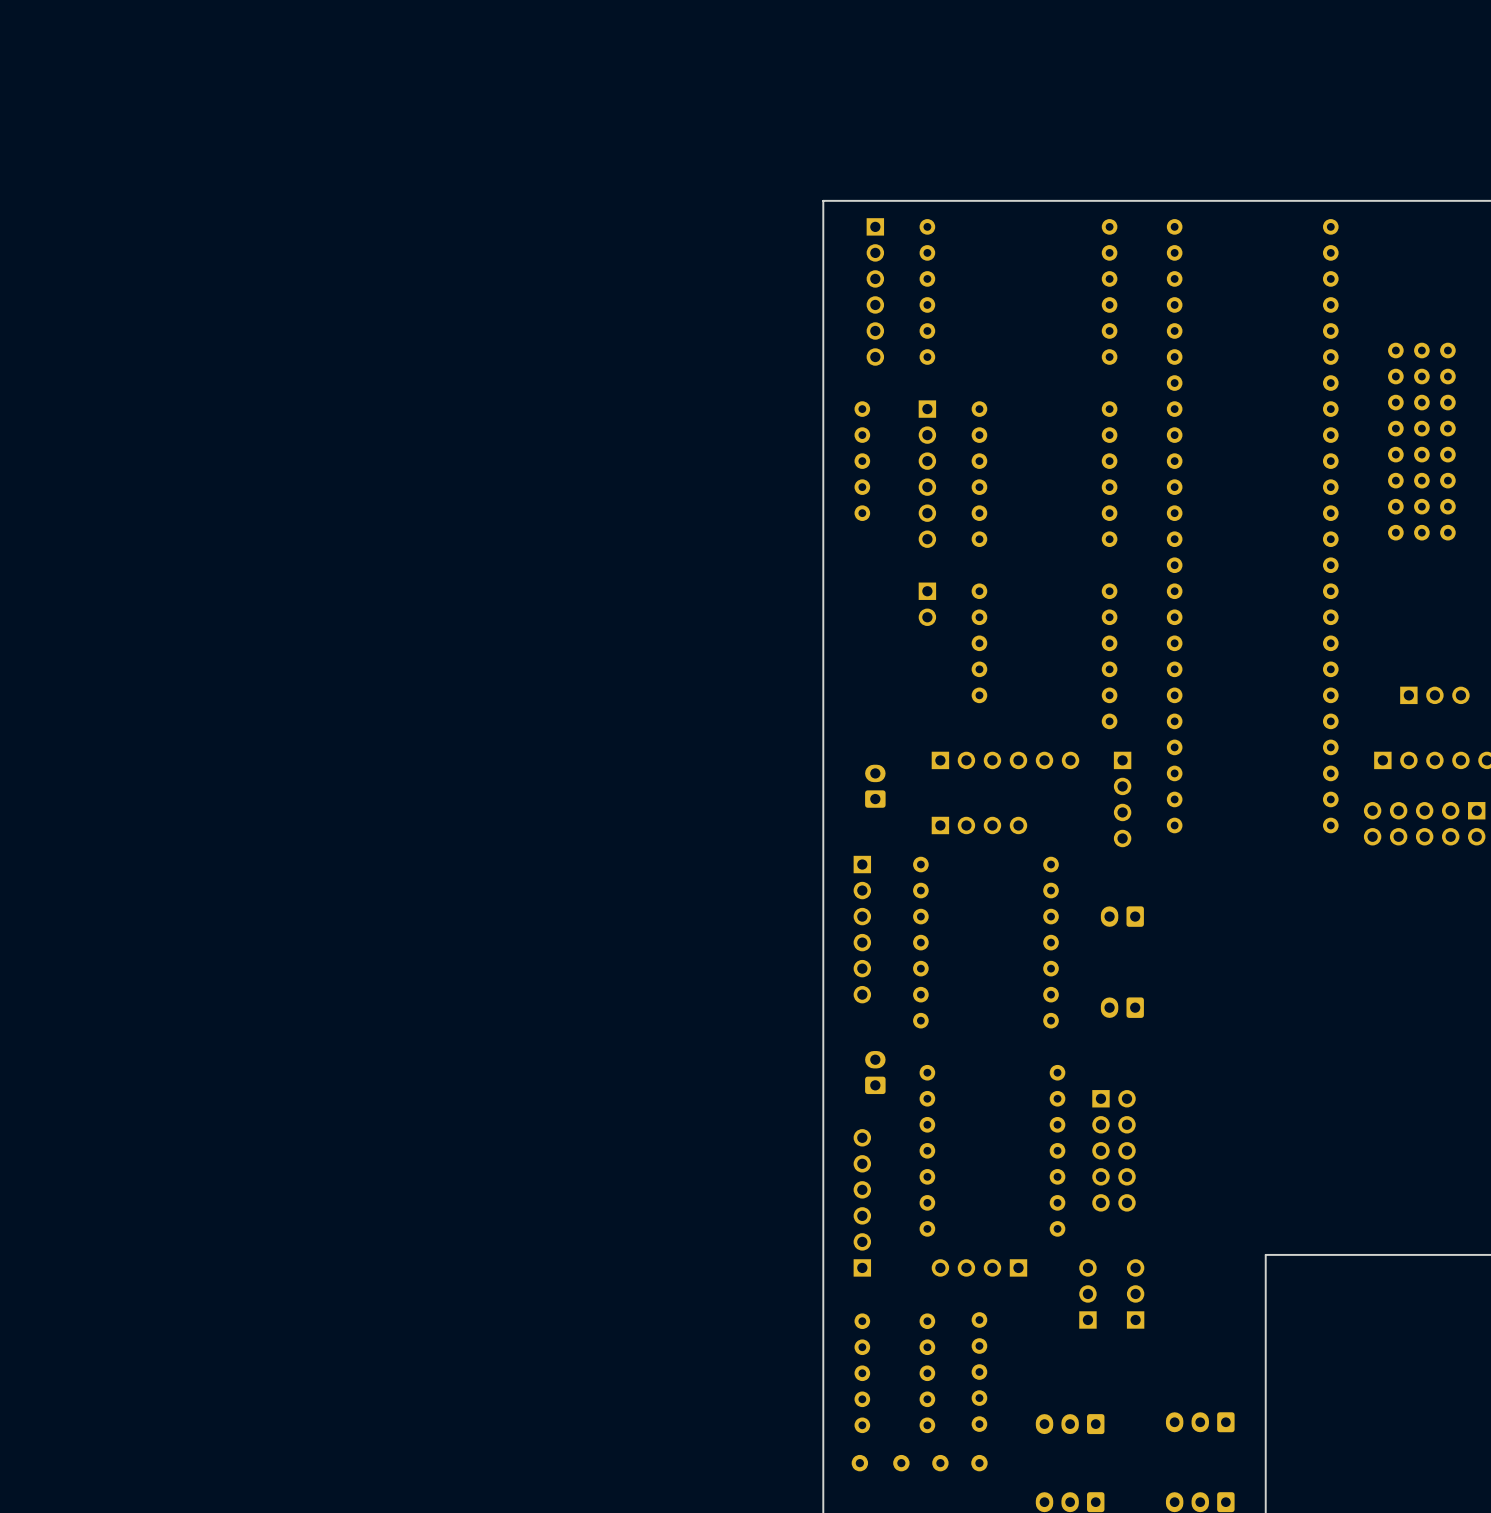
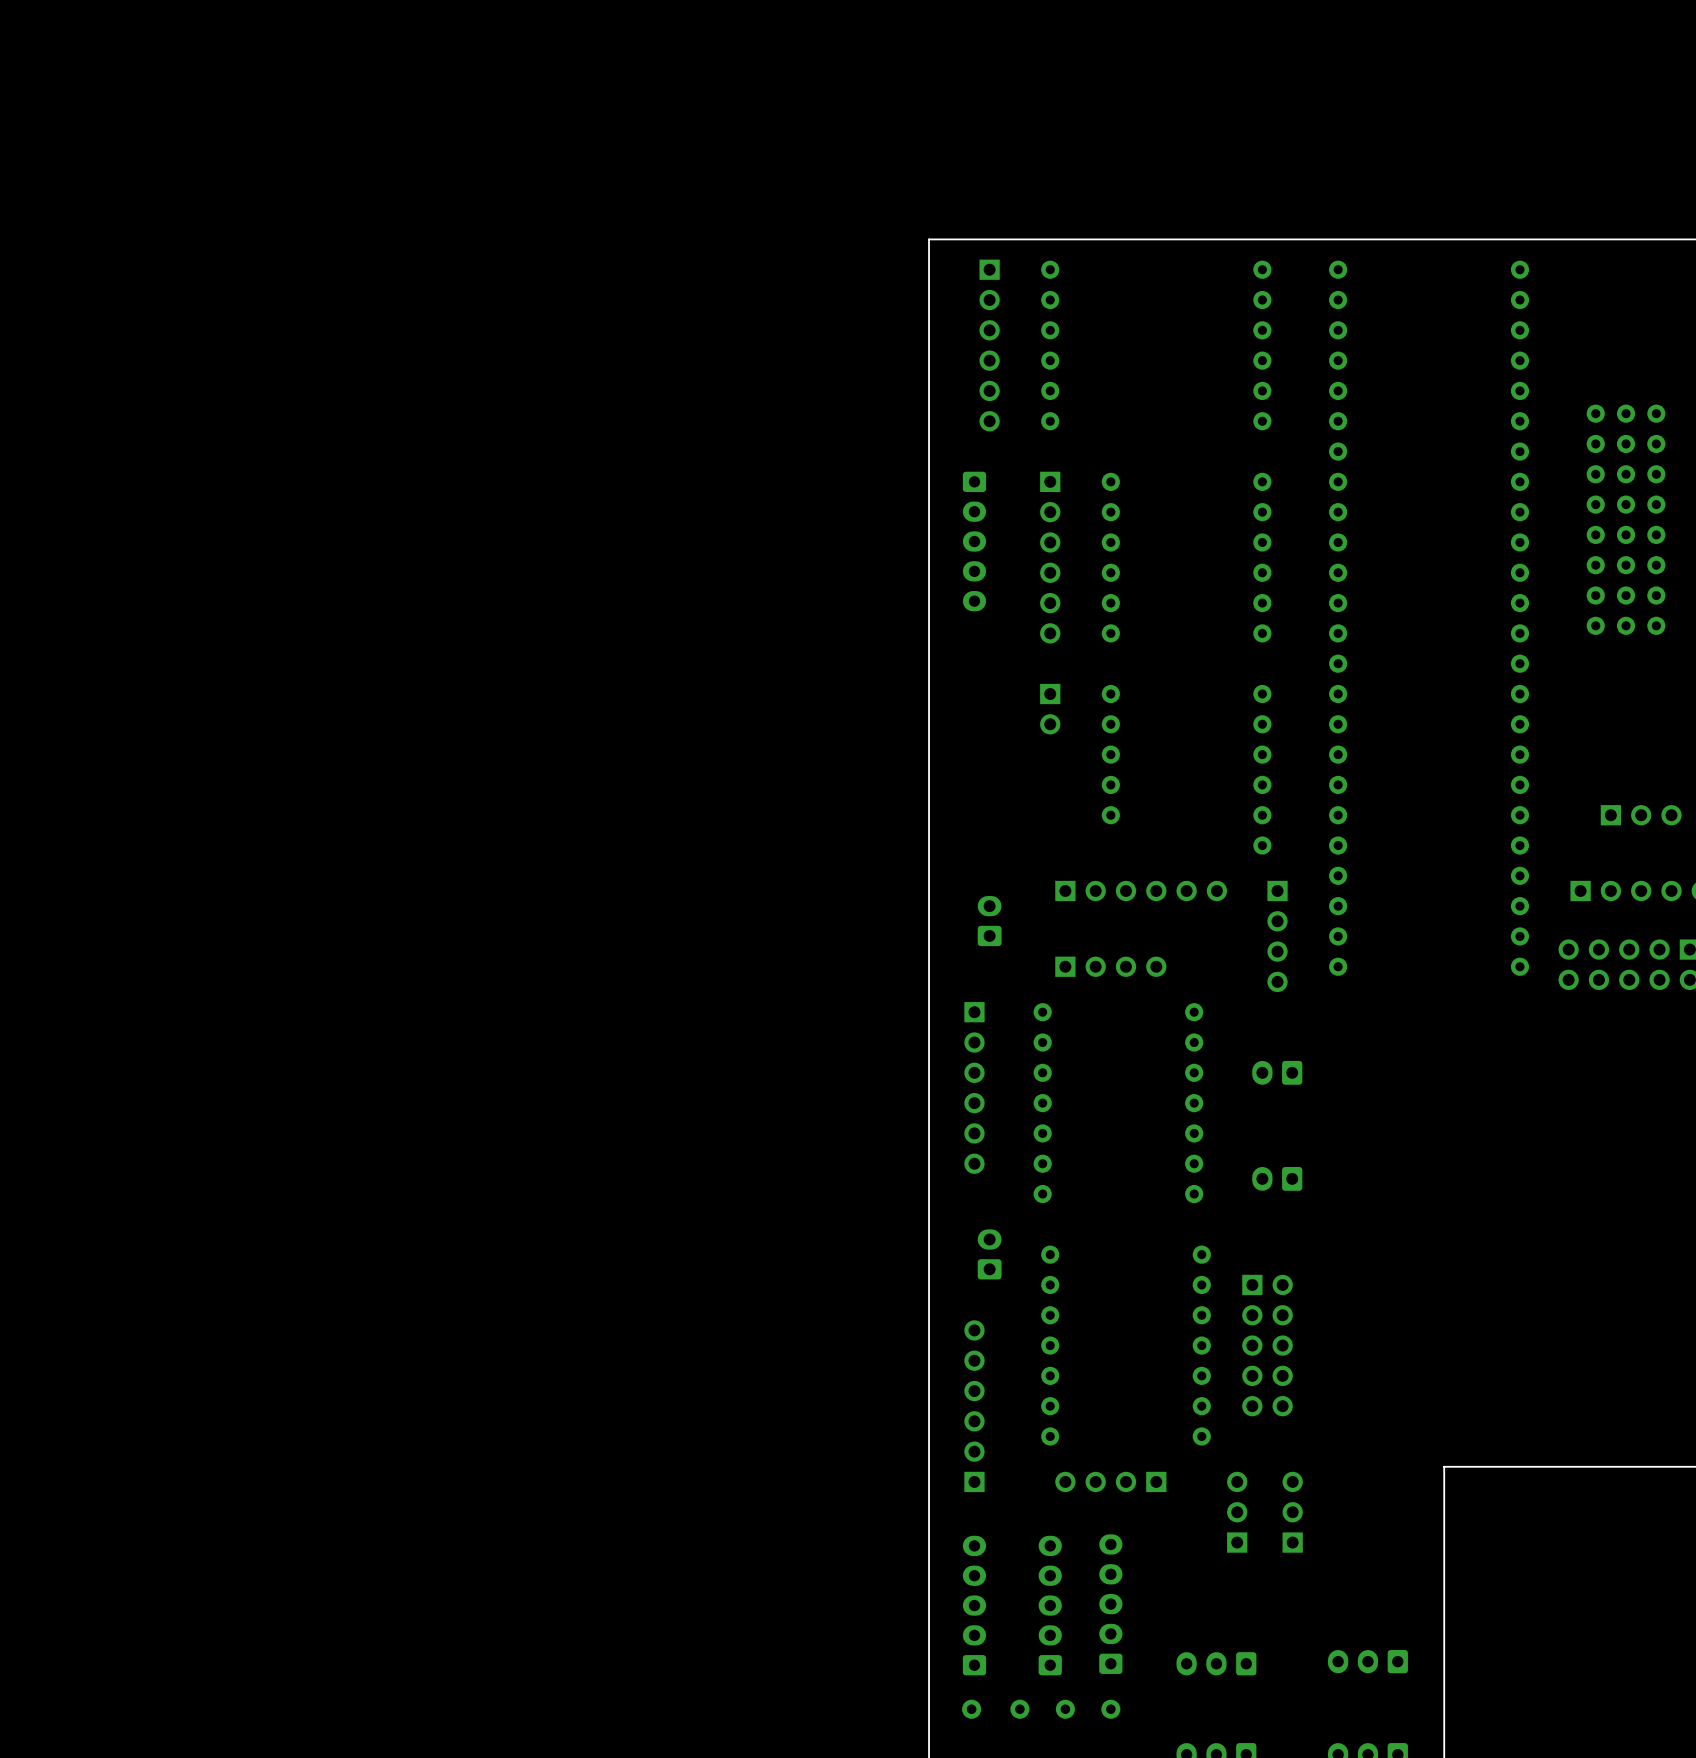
part footprint: [854, 401, 871, 521] -> [962, 471, 987, 612]
part footprint: [971, 1312, 988, 1432] -> [1099, 1534, 1123, 1674]
part footprint: [854, 1313, 871, 1434] -> [962, 1535, 987, 1676]
part footprint: [919, 1313, 936, 1434] -> [1038, 1535, 1062, 1676]

